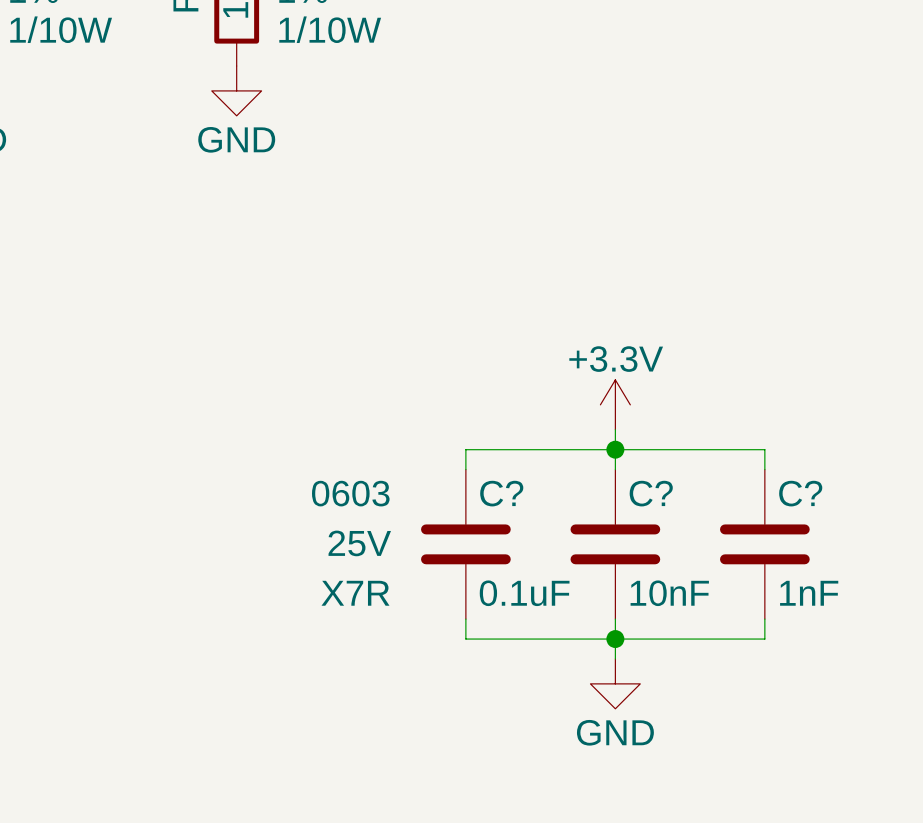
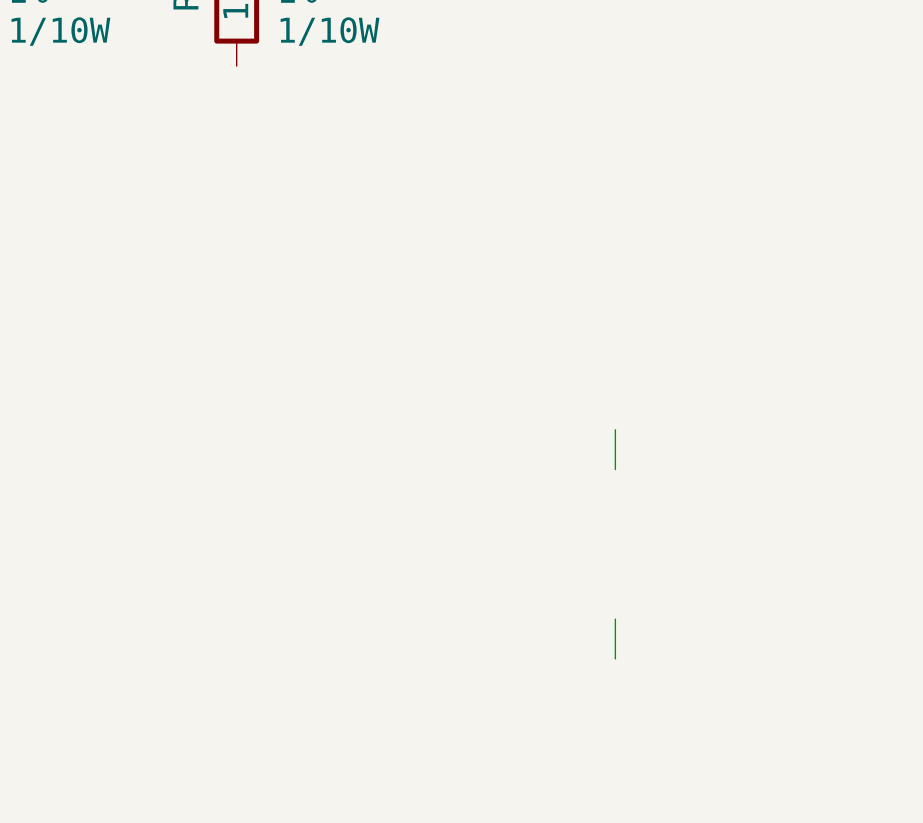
power symbol: GND (236, 90) -> none
power symbol: +3.3V (615, 404) -> none
junction: (615, 449) -> none
wire: (465, 469) (465, 449) (764, 449) (764, 469) -> none
C?: 0.1uF (465, 544) -> none
C?: 10nF (615, 544) -> none
C?: 1nF (764, 544) -> none
wire: (465, 619) (465, 639) (764, 639) (764, 619) -> none
junction: (615, 639) -> none
power symbol: GND (615, 683) -> none

